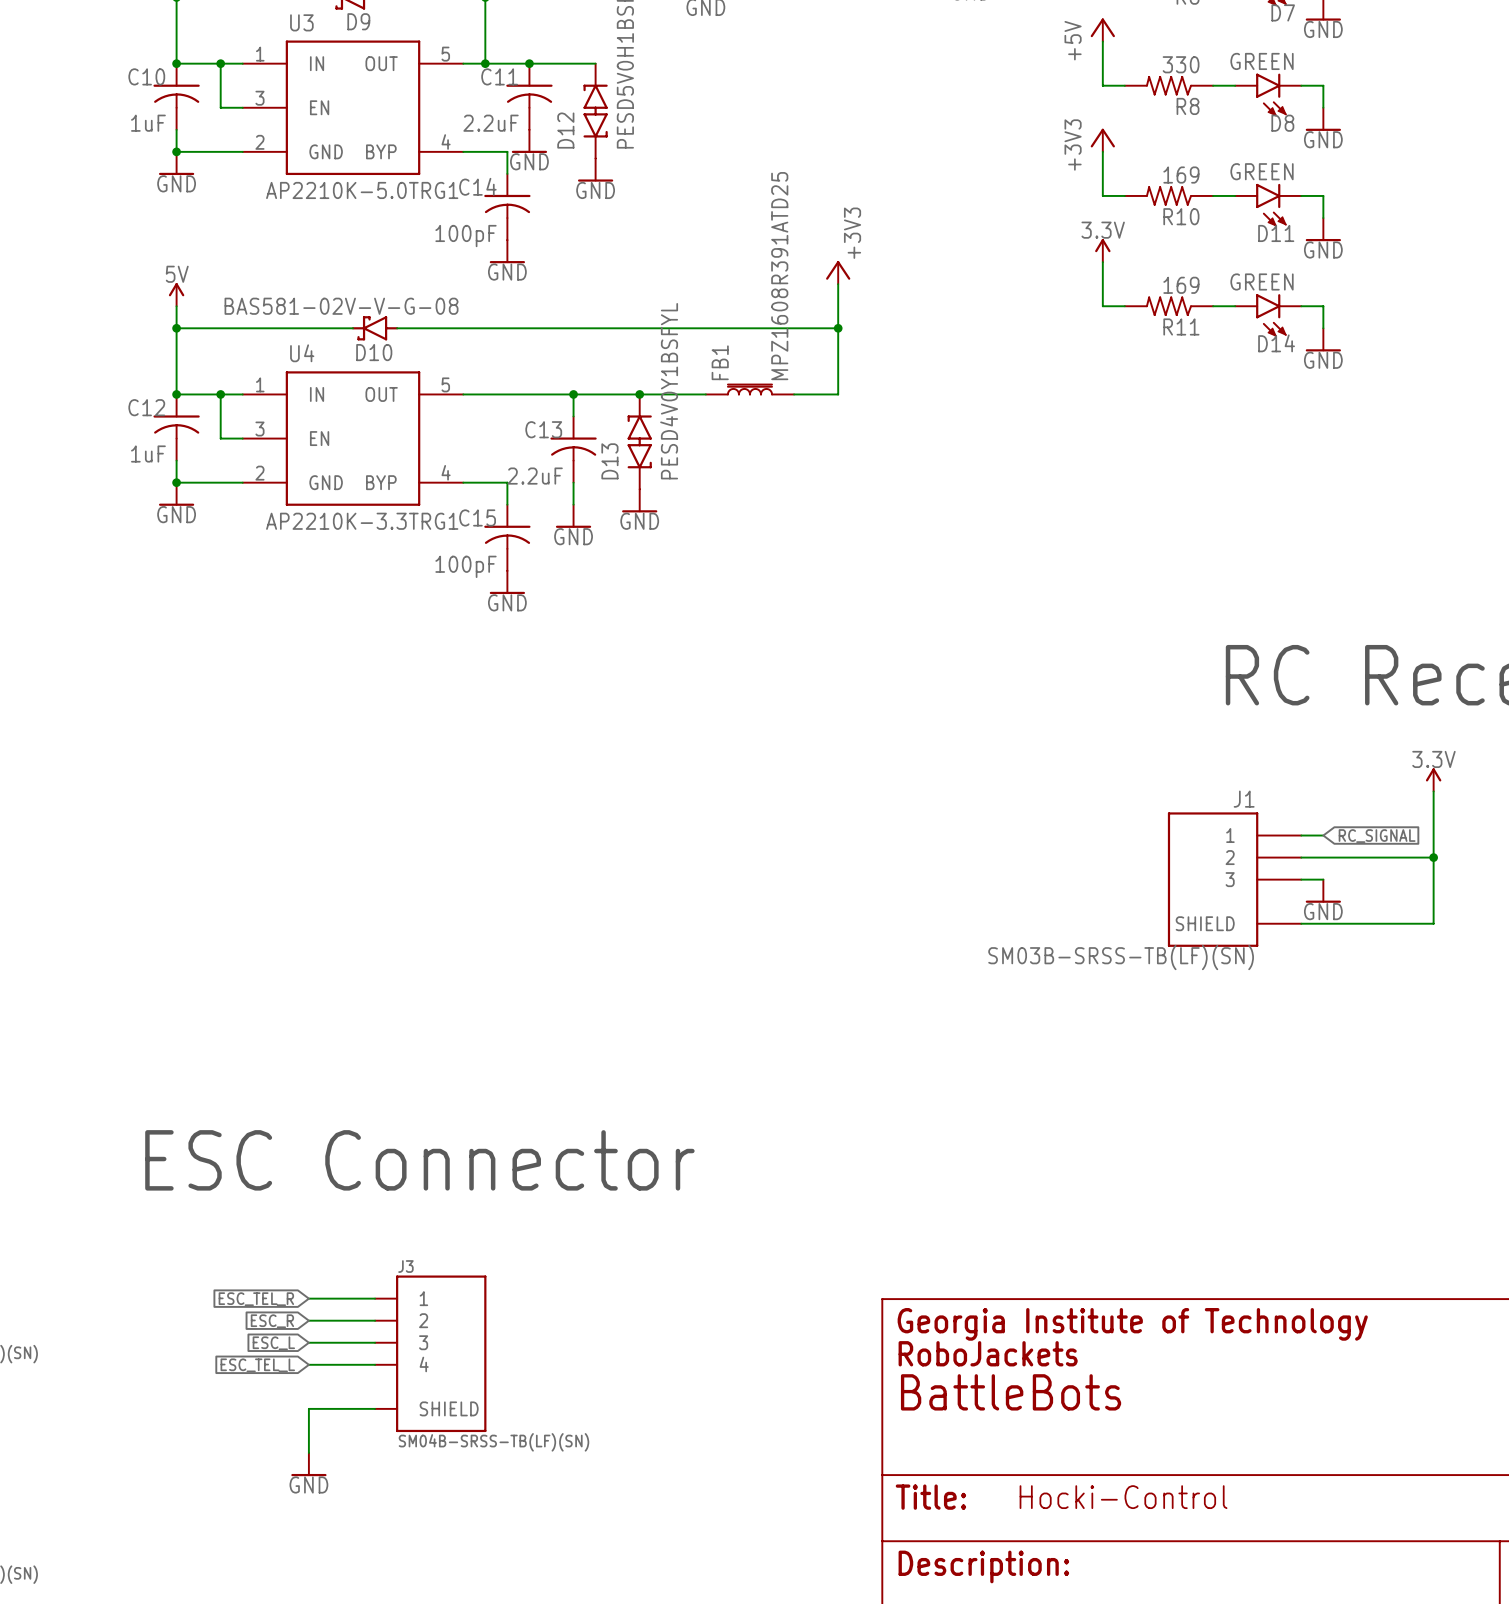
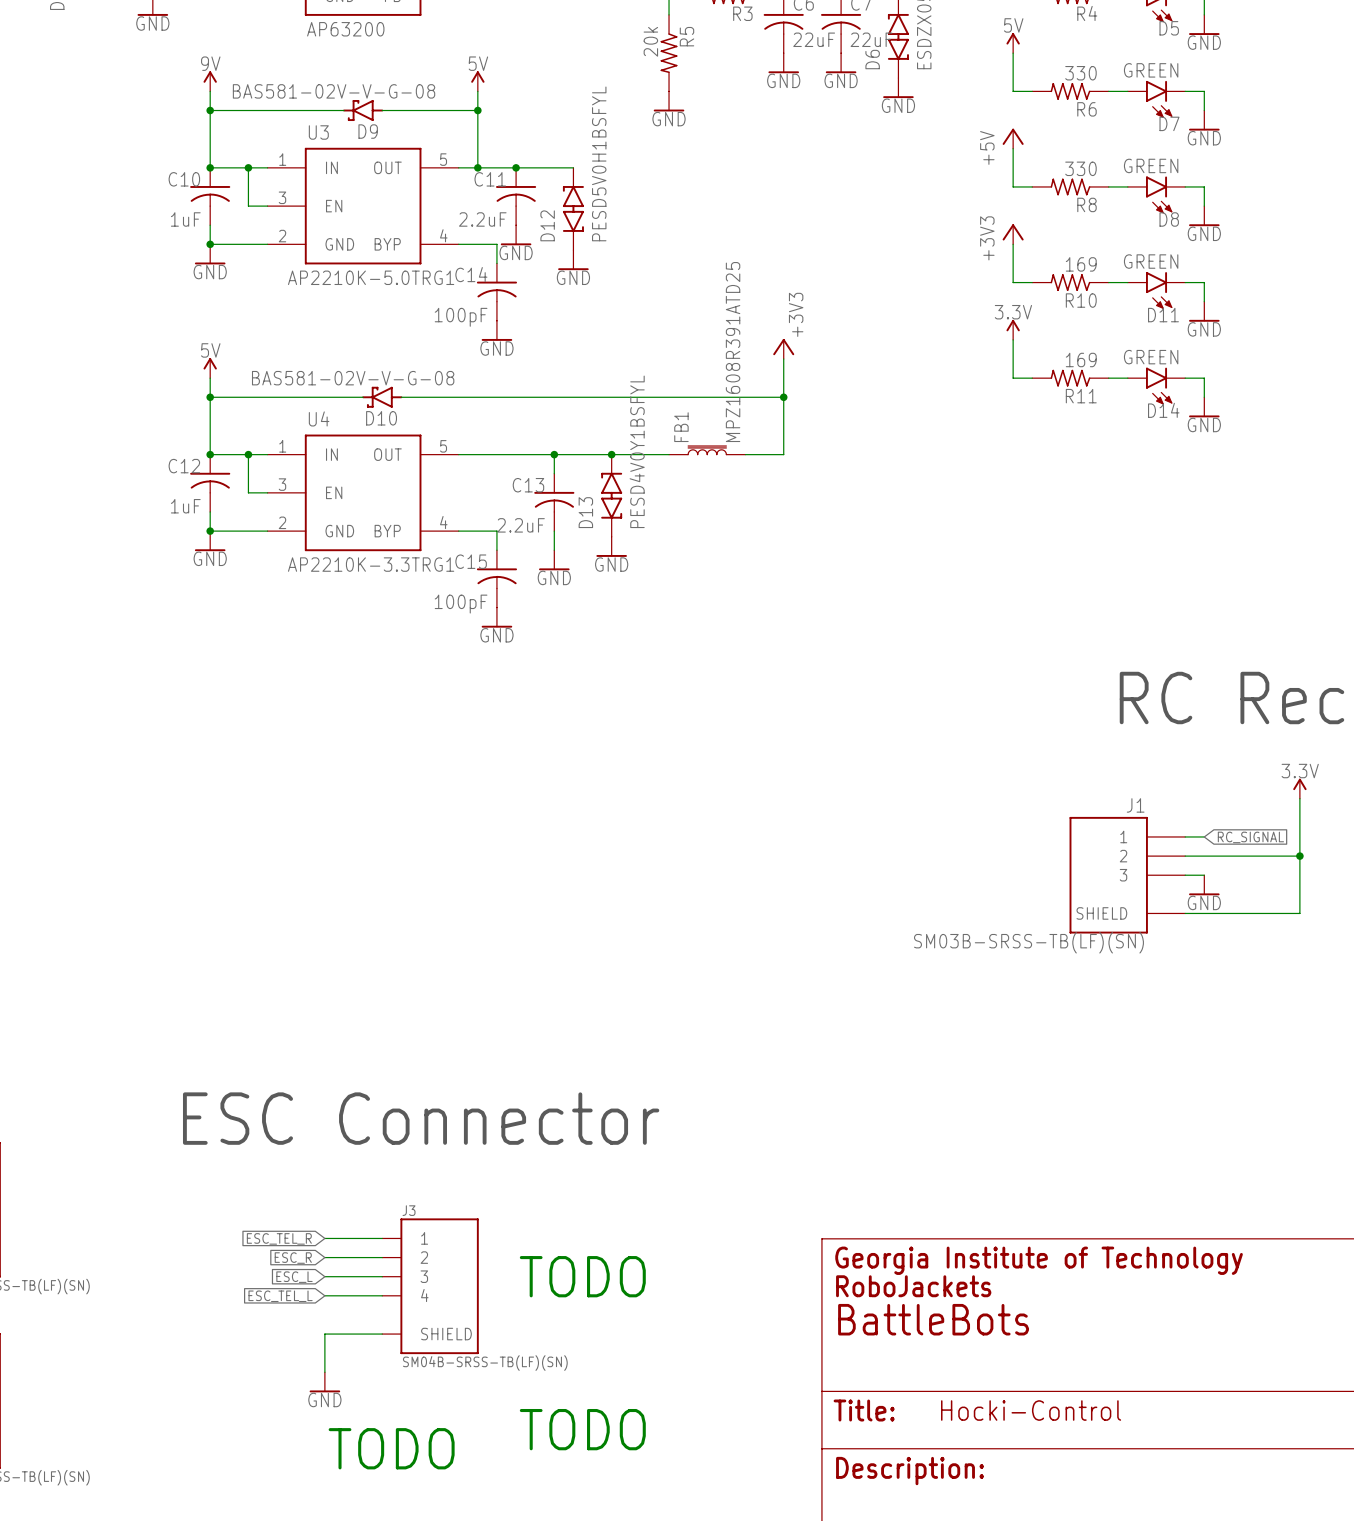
text: none -> TODO (582, 1276)
text: none -> TODO (582, 1429)
text: none -> TODO (391, 1448)

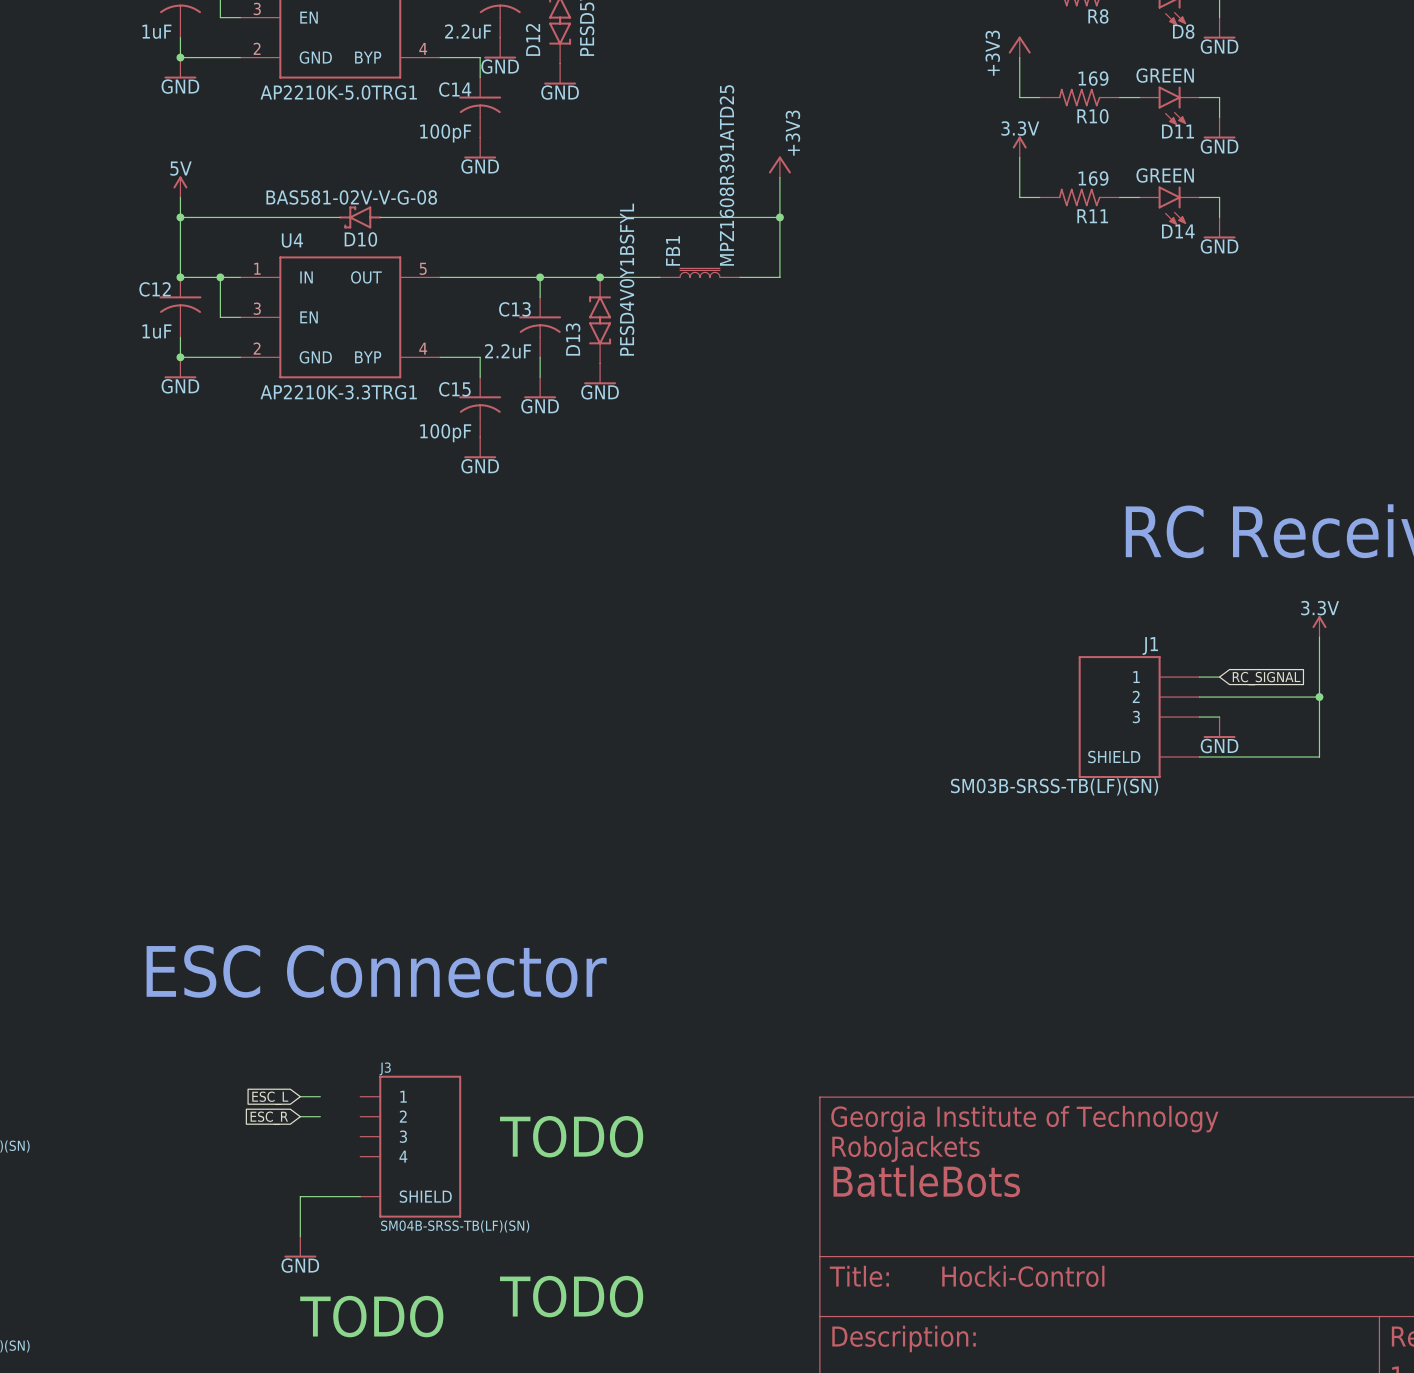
global label: ESC_TEL_R (279, 1238) -> ESC_L (270, 1098)
wire: (344, 1238) (382, 1238) -> none
wire: (344, 1257) (382, 1257) -> none
wire: (324, 1276) (382, 1276) -> none
global label: ESC_L (294, 1277) -> none
wire: (324, 1295) (382, 1295) -> none
global label: ESC_TEL_L (280, 1296) -> none

